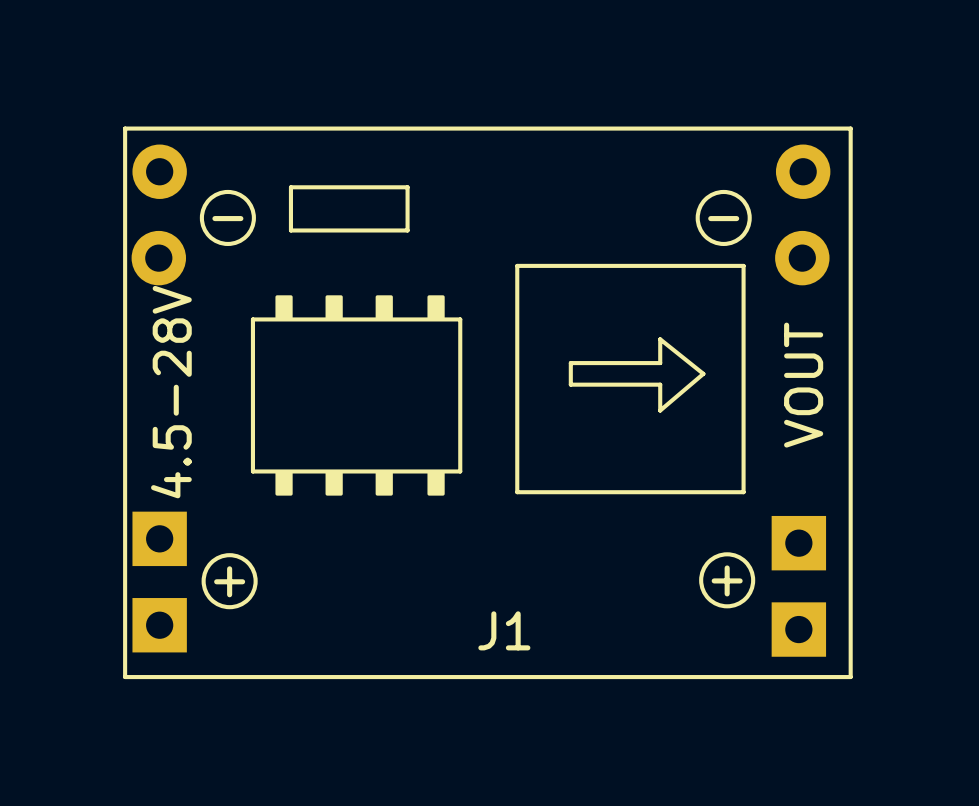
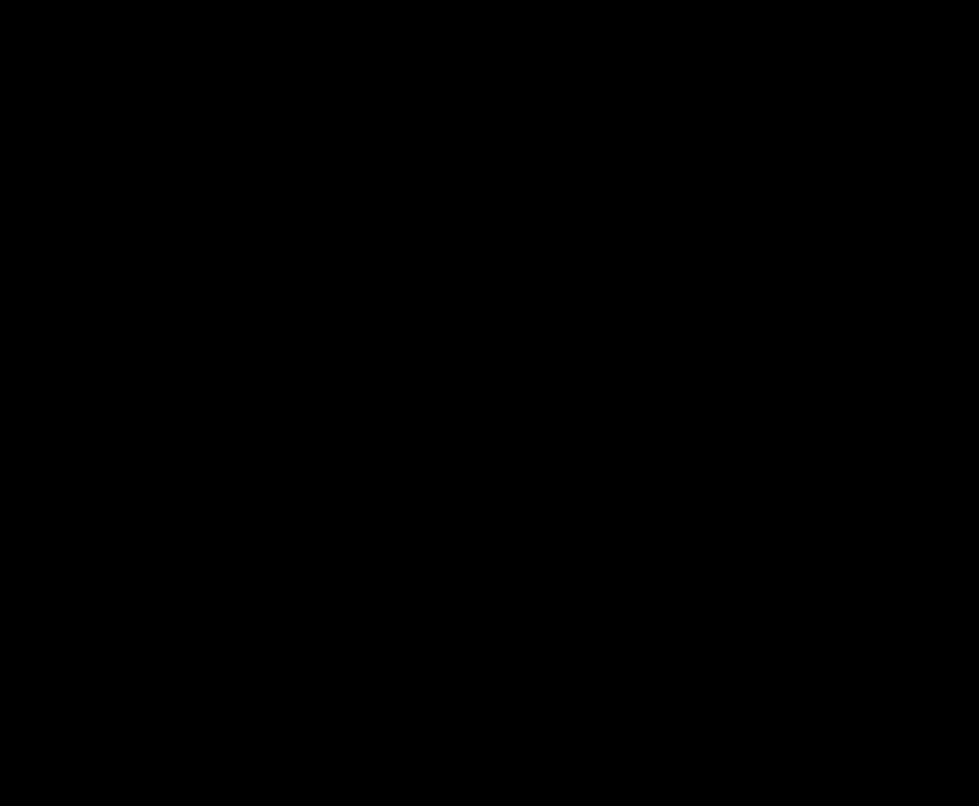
J1: (487, 402) -> none

